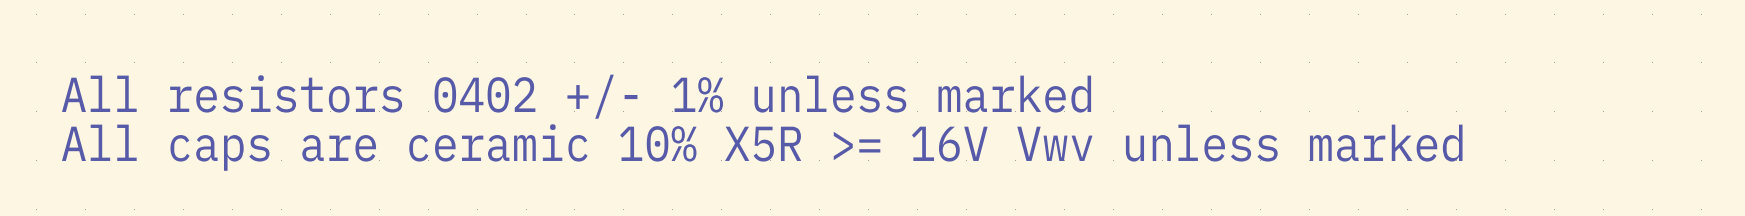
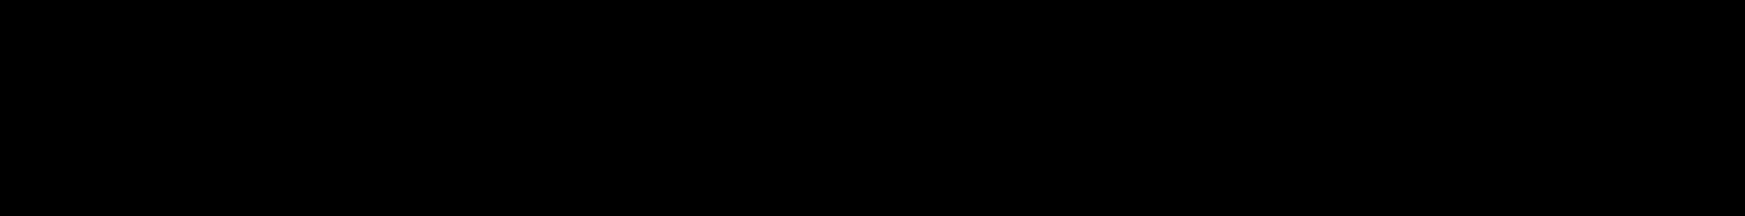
text: All resistors 0402 +/- 1% unless marked (576, 96) -> none
text: All caps are ceramic 10% X5R >= 16V Vwv unless marked (762, 147) -> none

